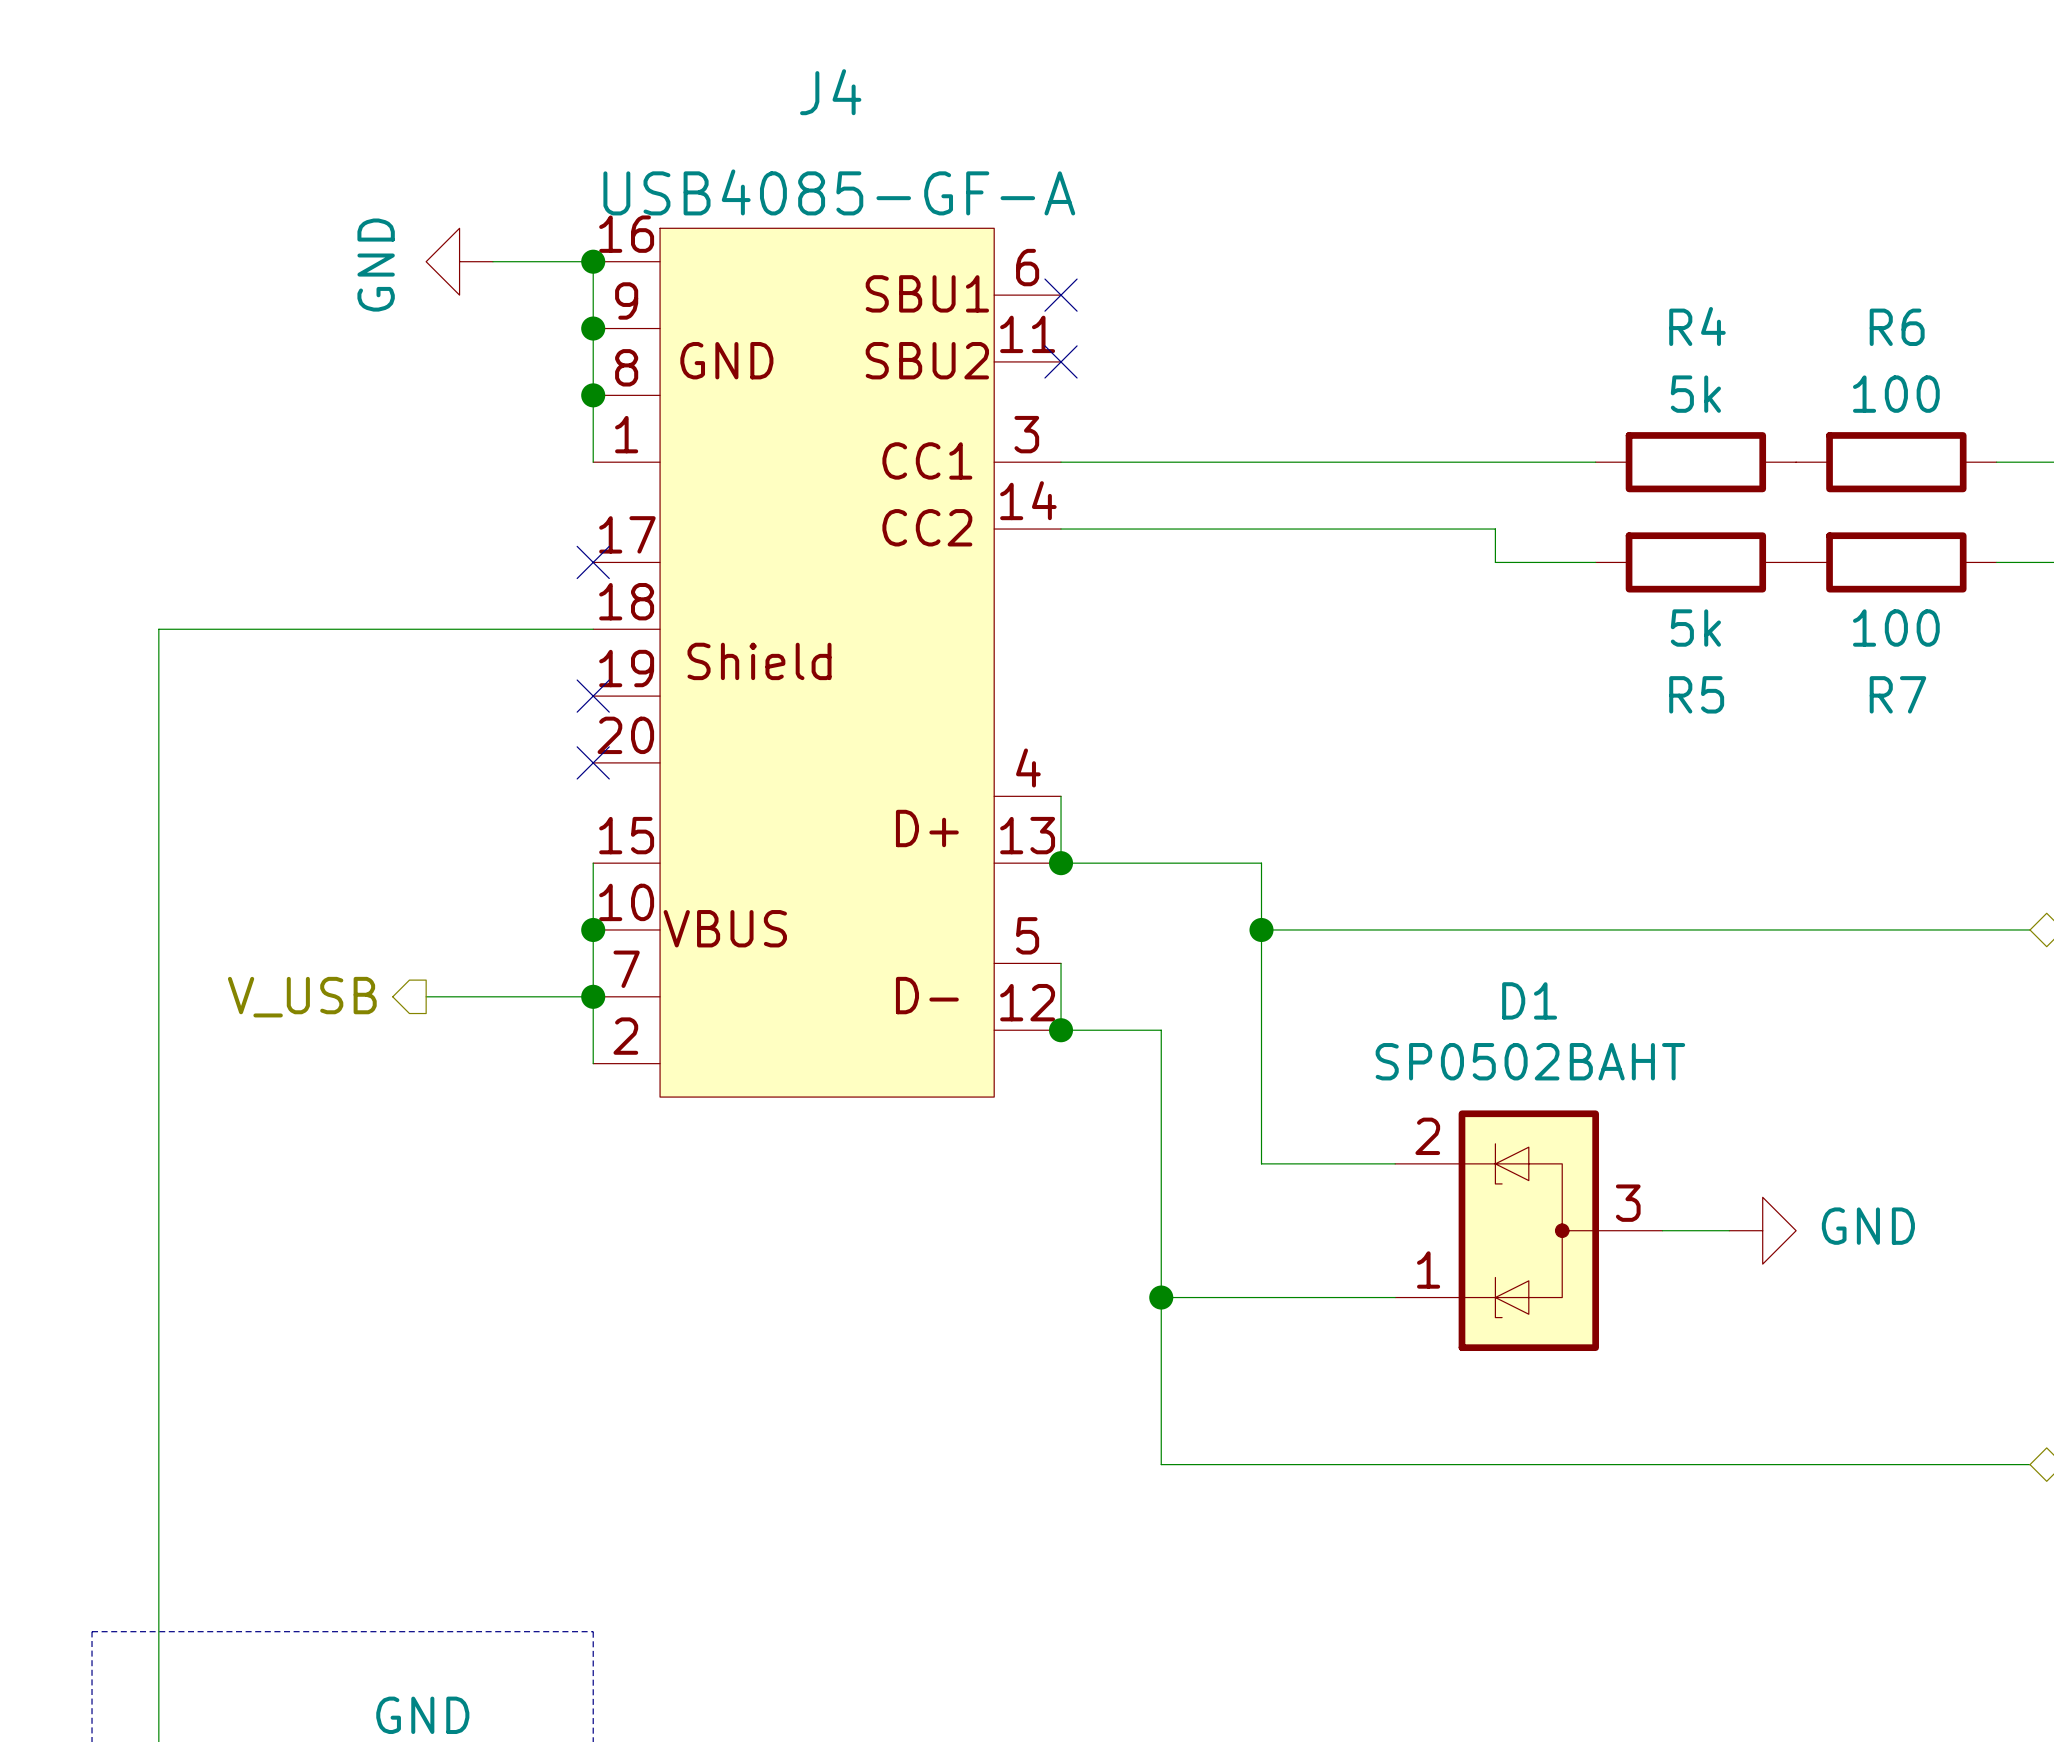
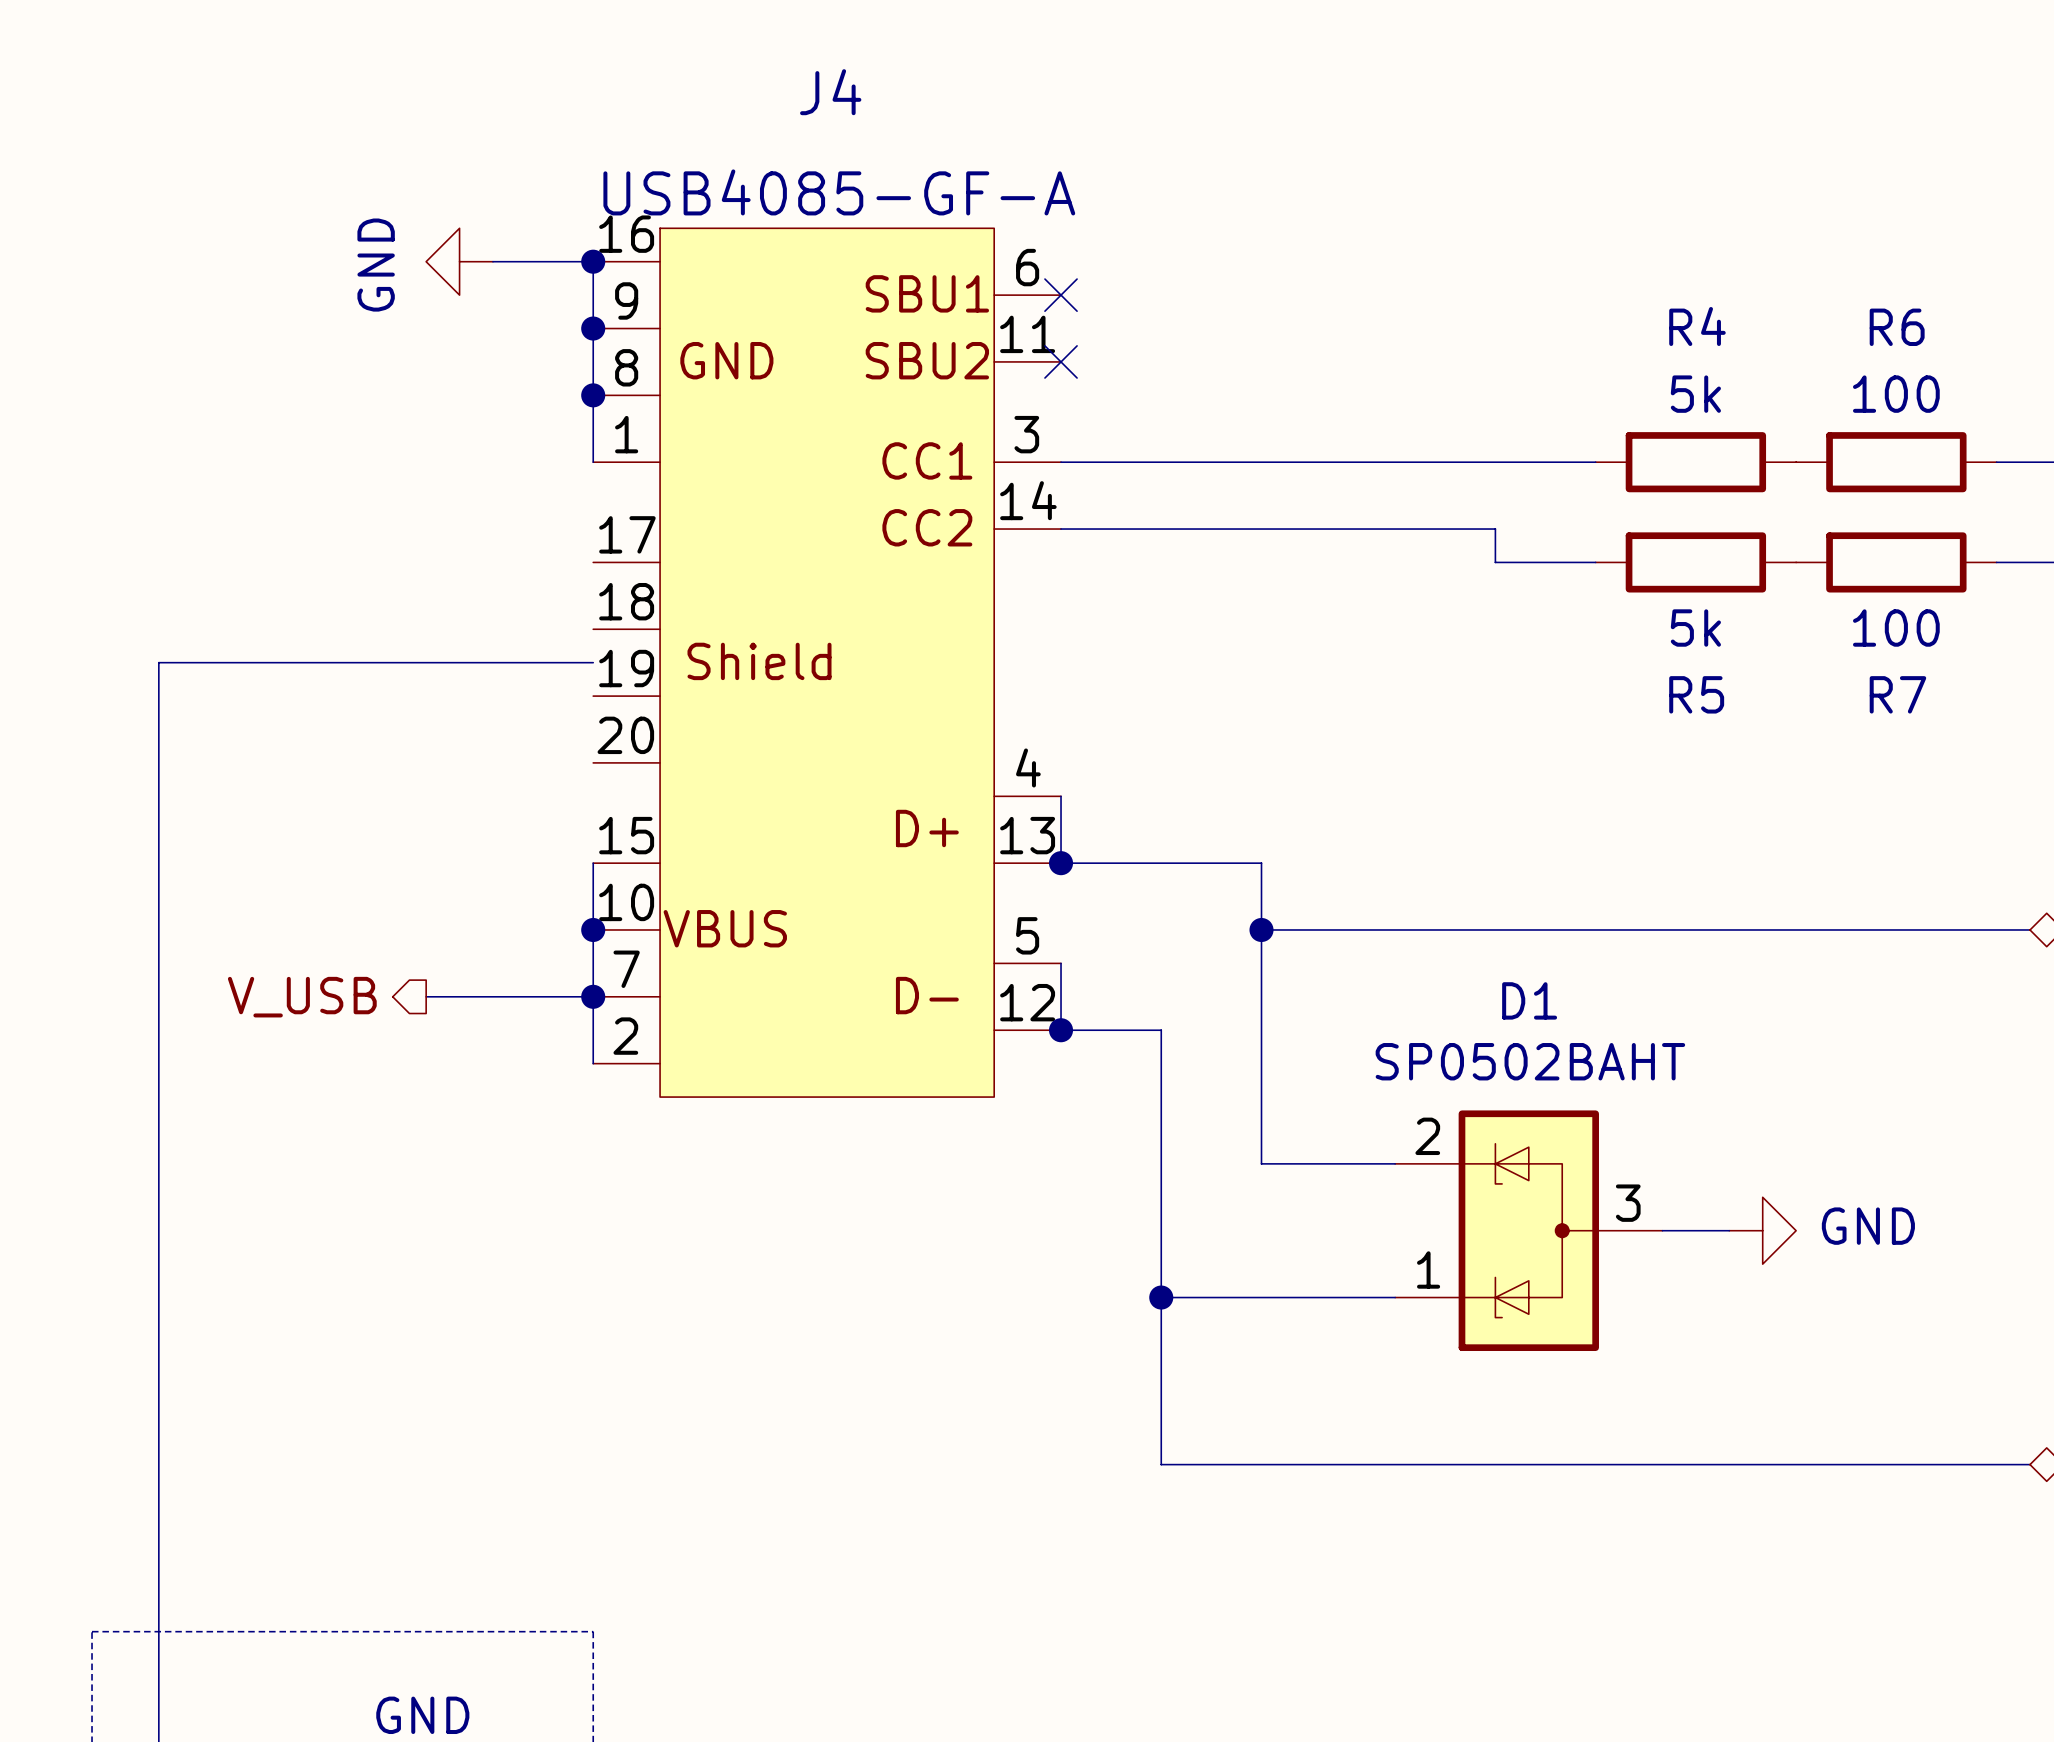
no-connect mark: (593, 562) -> none
wire: (593, 629) (158, 629) (158, 662) -> (593, 662) (158, 662)
no-connect mark: (593, 696) -> none
no-connect mark: (593, 762) -> none

